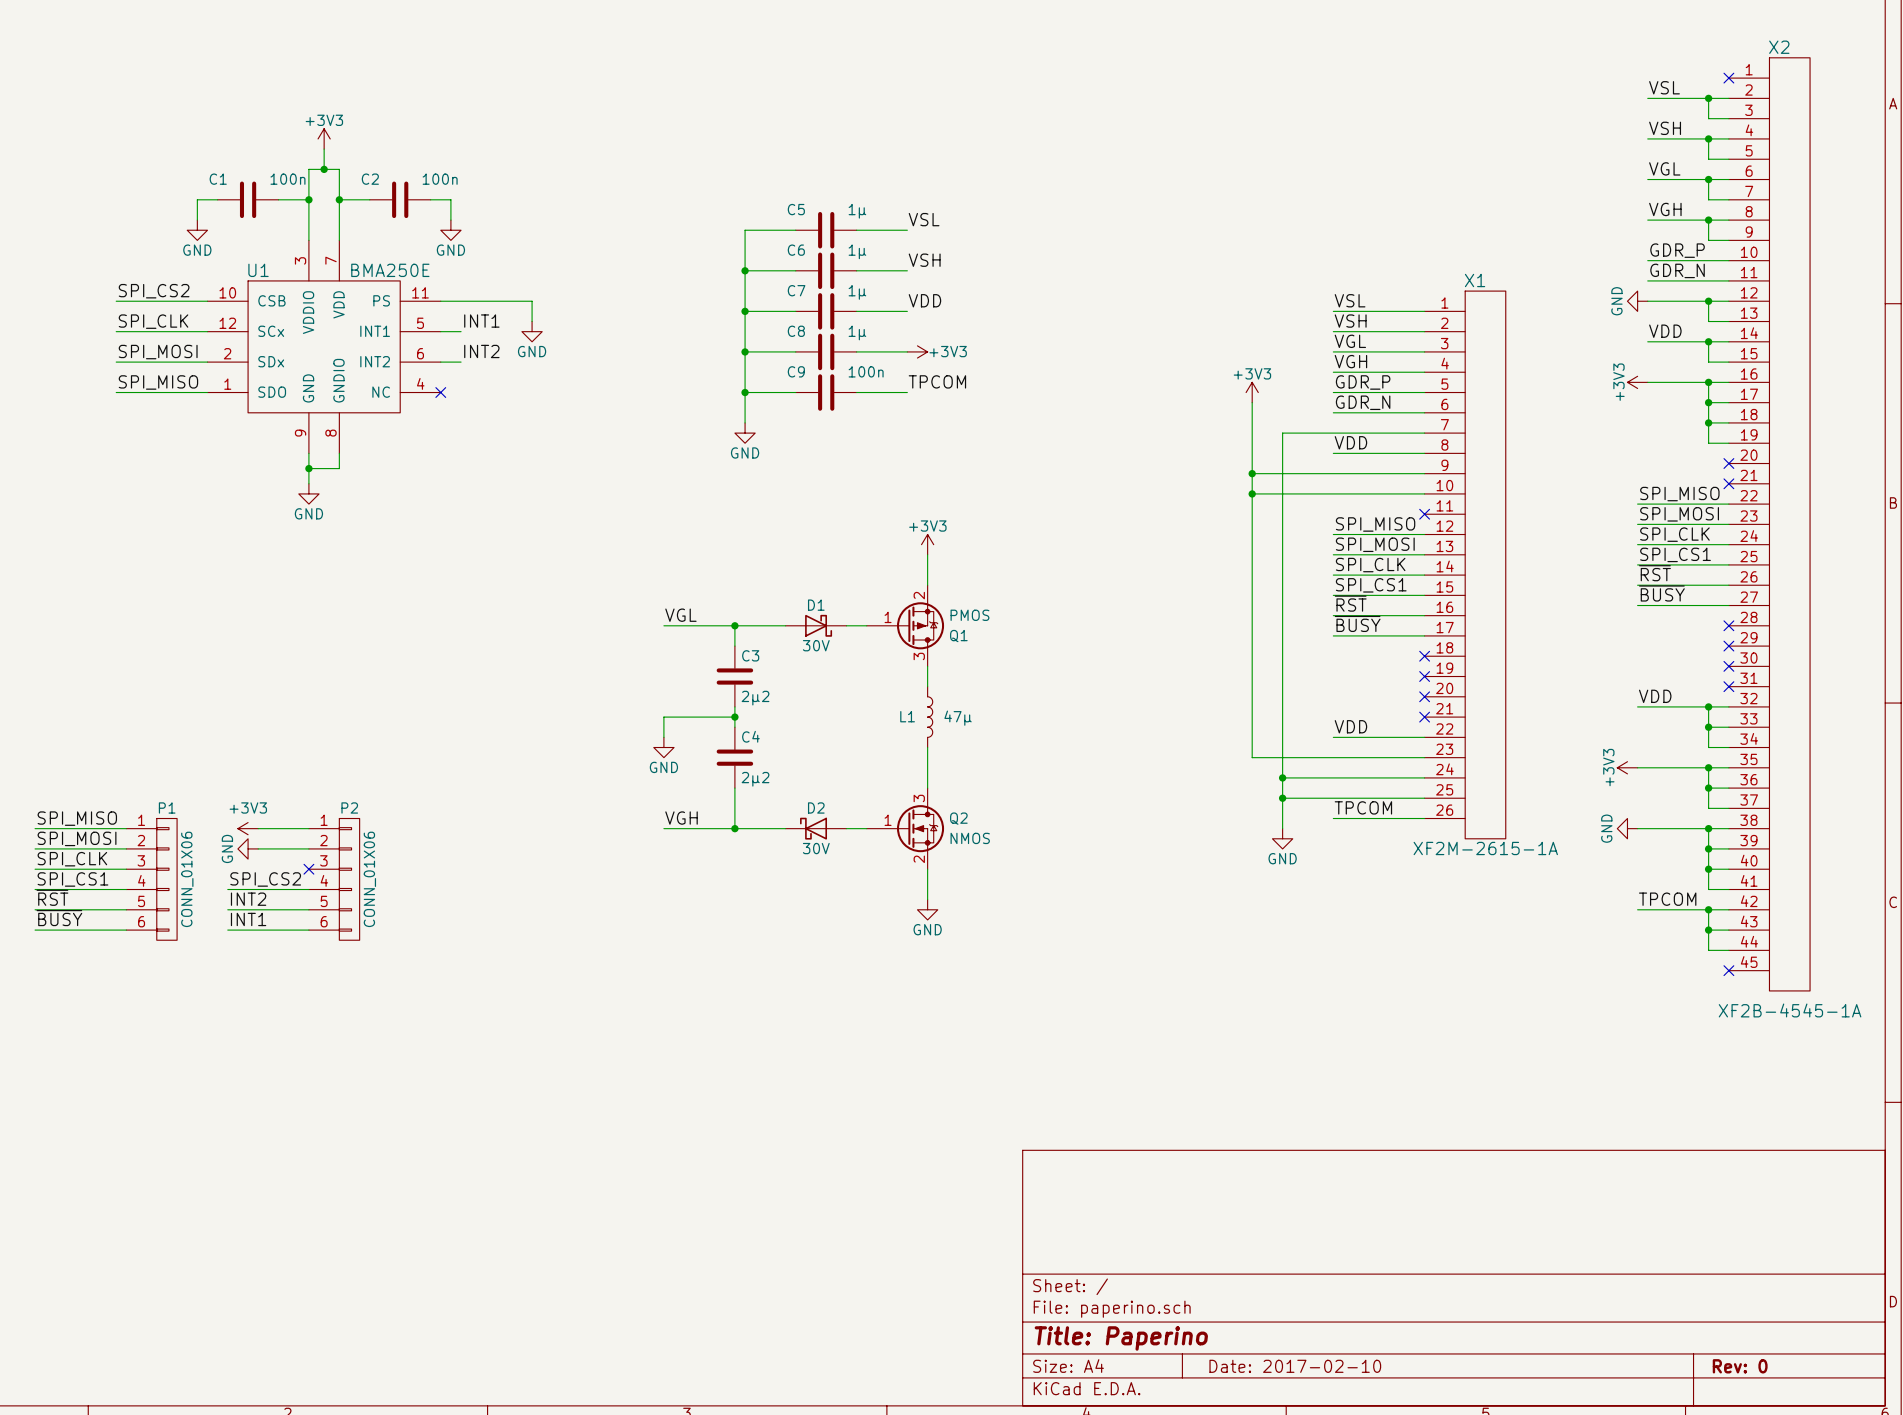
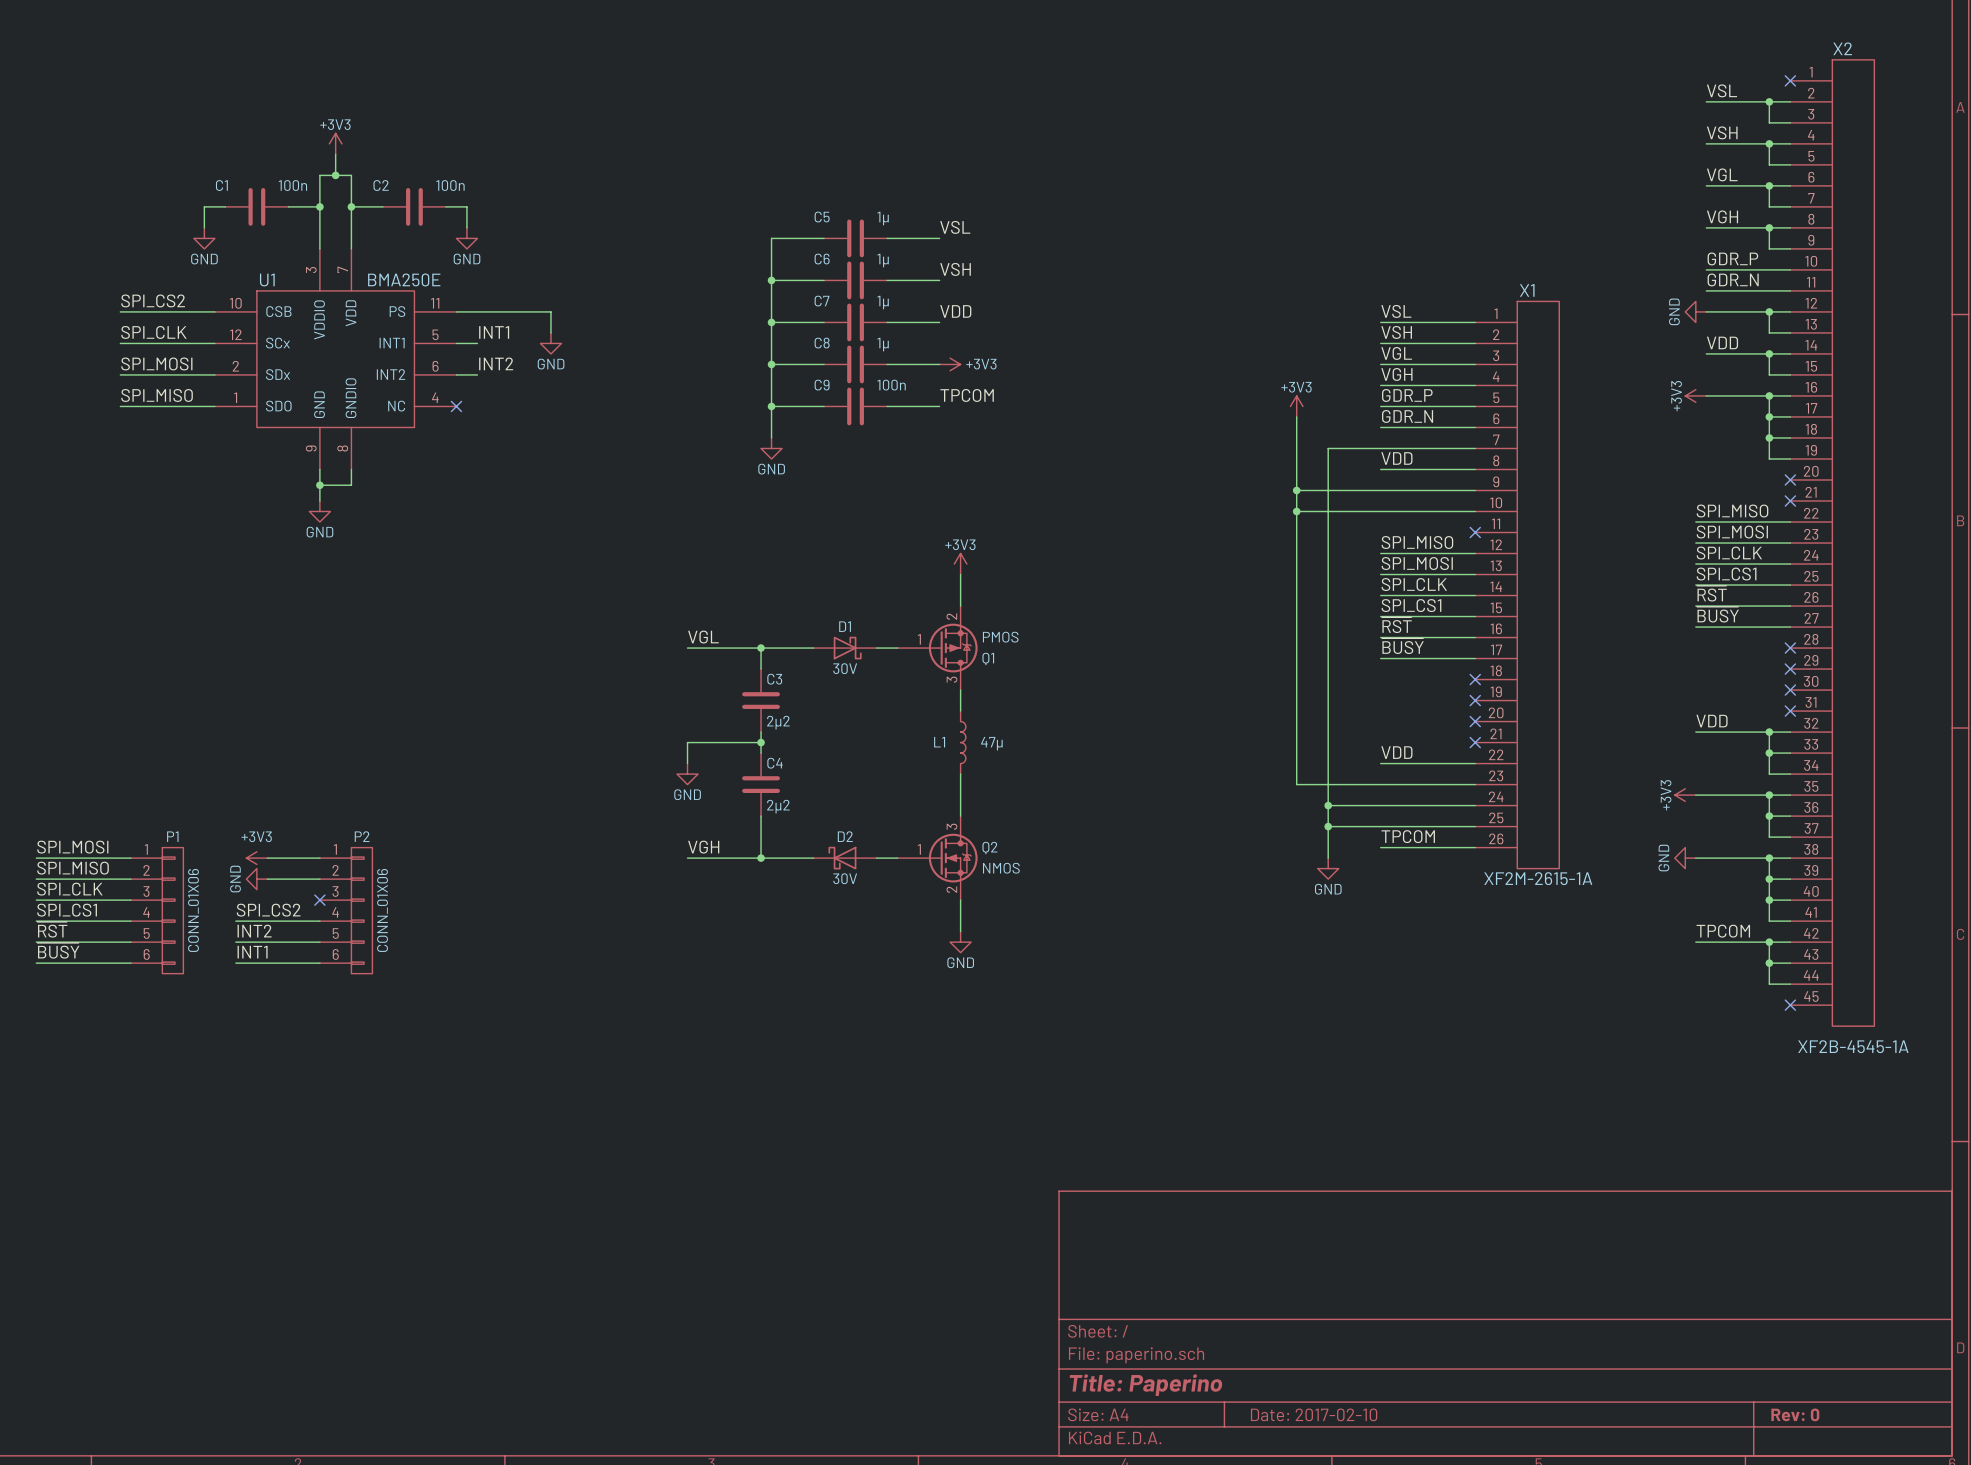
label: SPI_MISO (77, 818) -> SPI_MOSI (72, 847)
label: SPI_MOSI (77, 838) -> SPI_MISO (73, 868)

